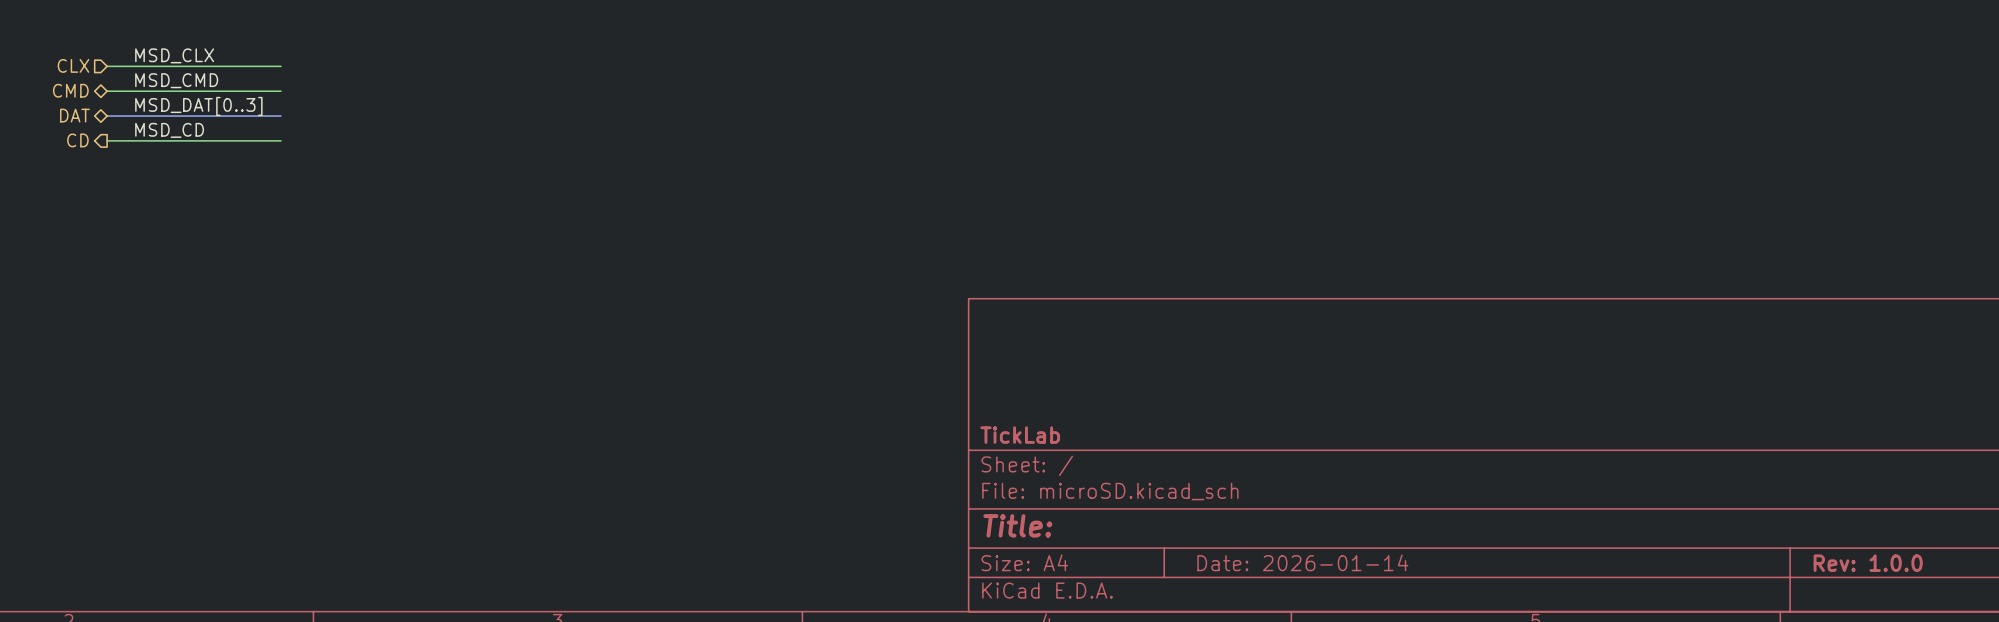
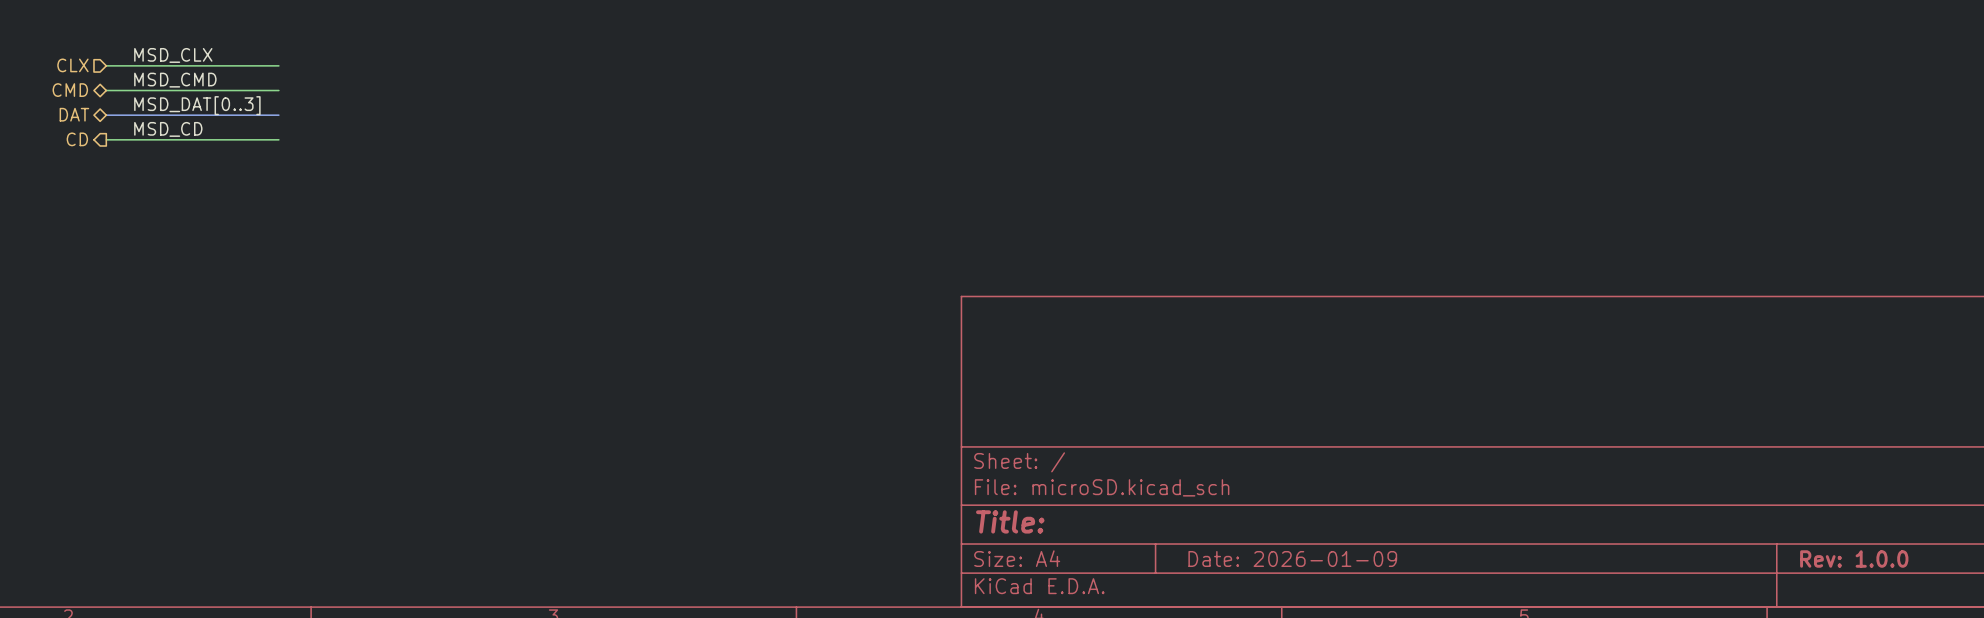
title block: TickLab (1020, 435) -> none
title block: Date: 2026-01-14 (1302, 562) -> Date: 2026-01-09 (1292, 558)

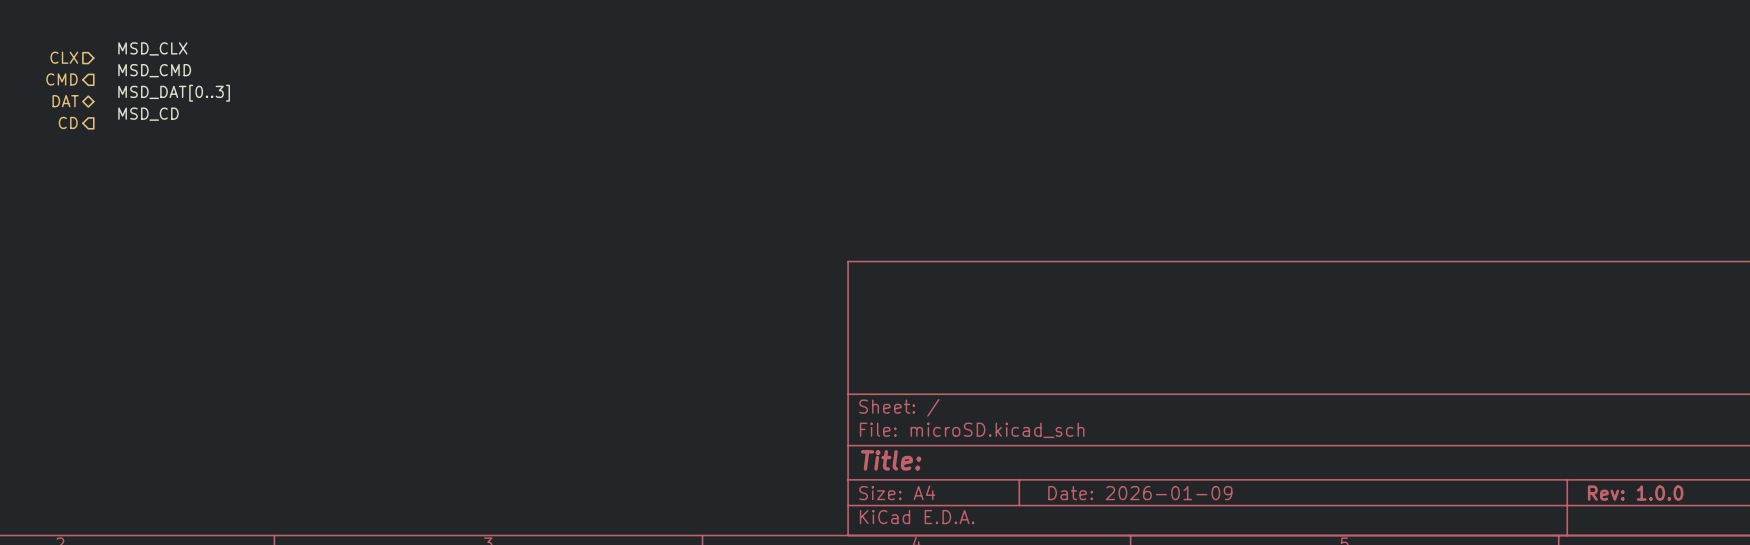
wire: (106, 65) (278, 65) -> none
hierarchical label shape: bidirectional (70, 90) -> output (62, 79)
wire: (106, 90) (278, 90) -> none
bus: (106, 115) (278, 115) -> none
wire: (106, 139) (278, 139) -> none

